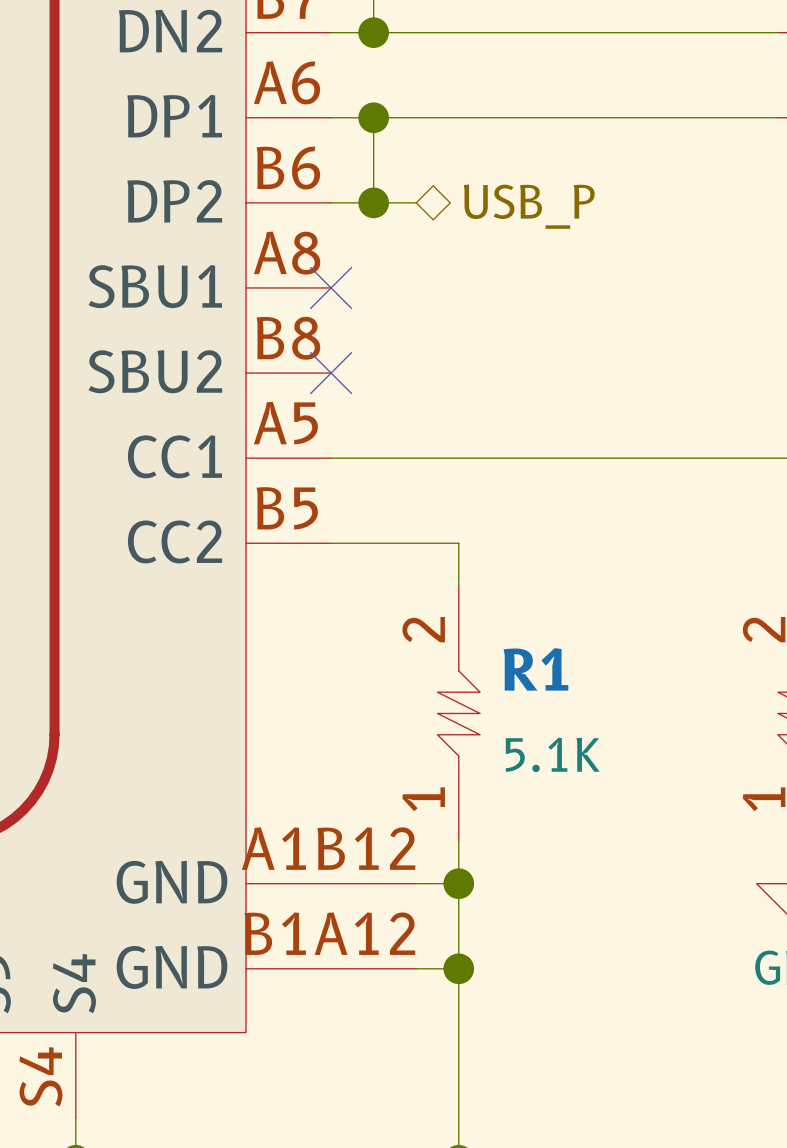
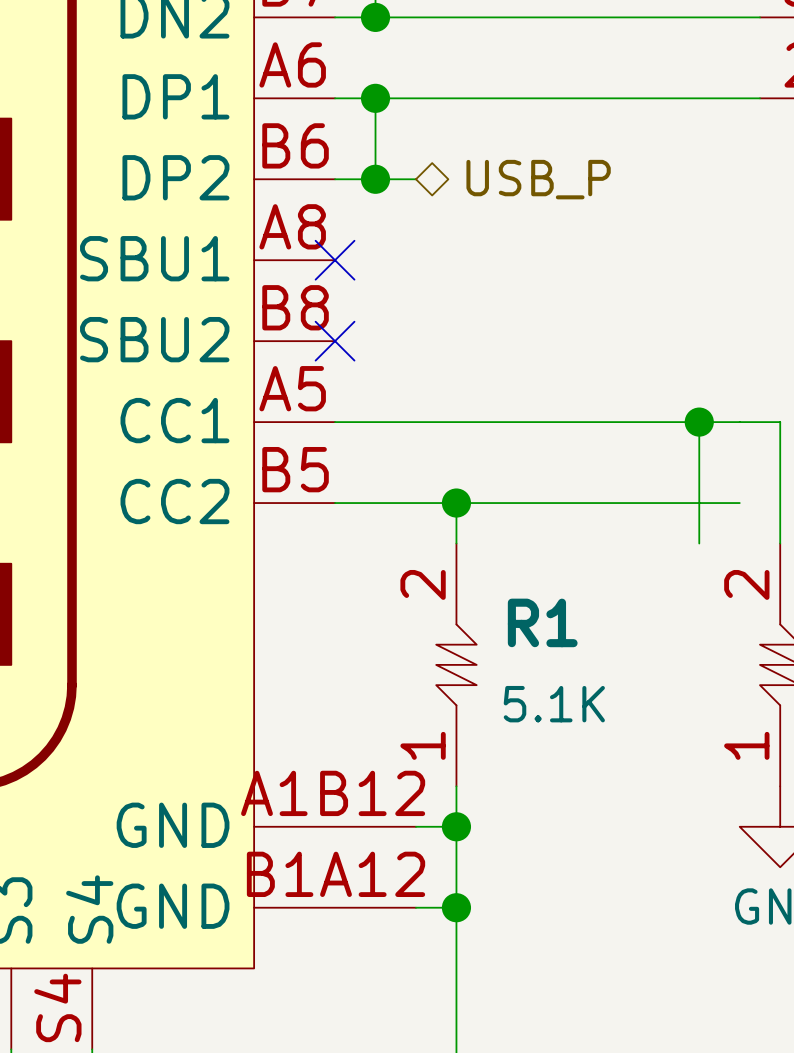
wire: none -> (699, 422) (699, 543)
junction: none -> (699, 422)
wire: none -> (456, 503) (739, 503)
junction: none -> (456, 503)

